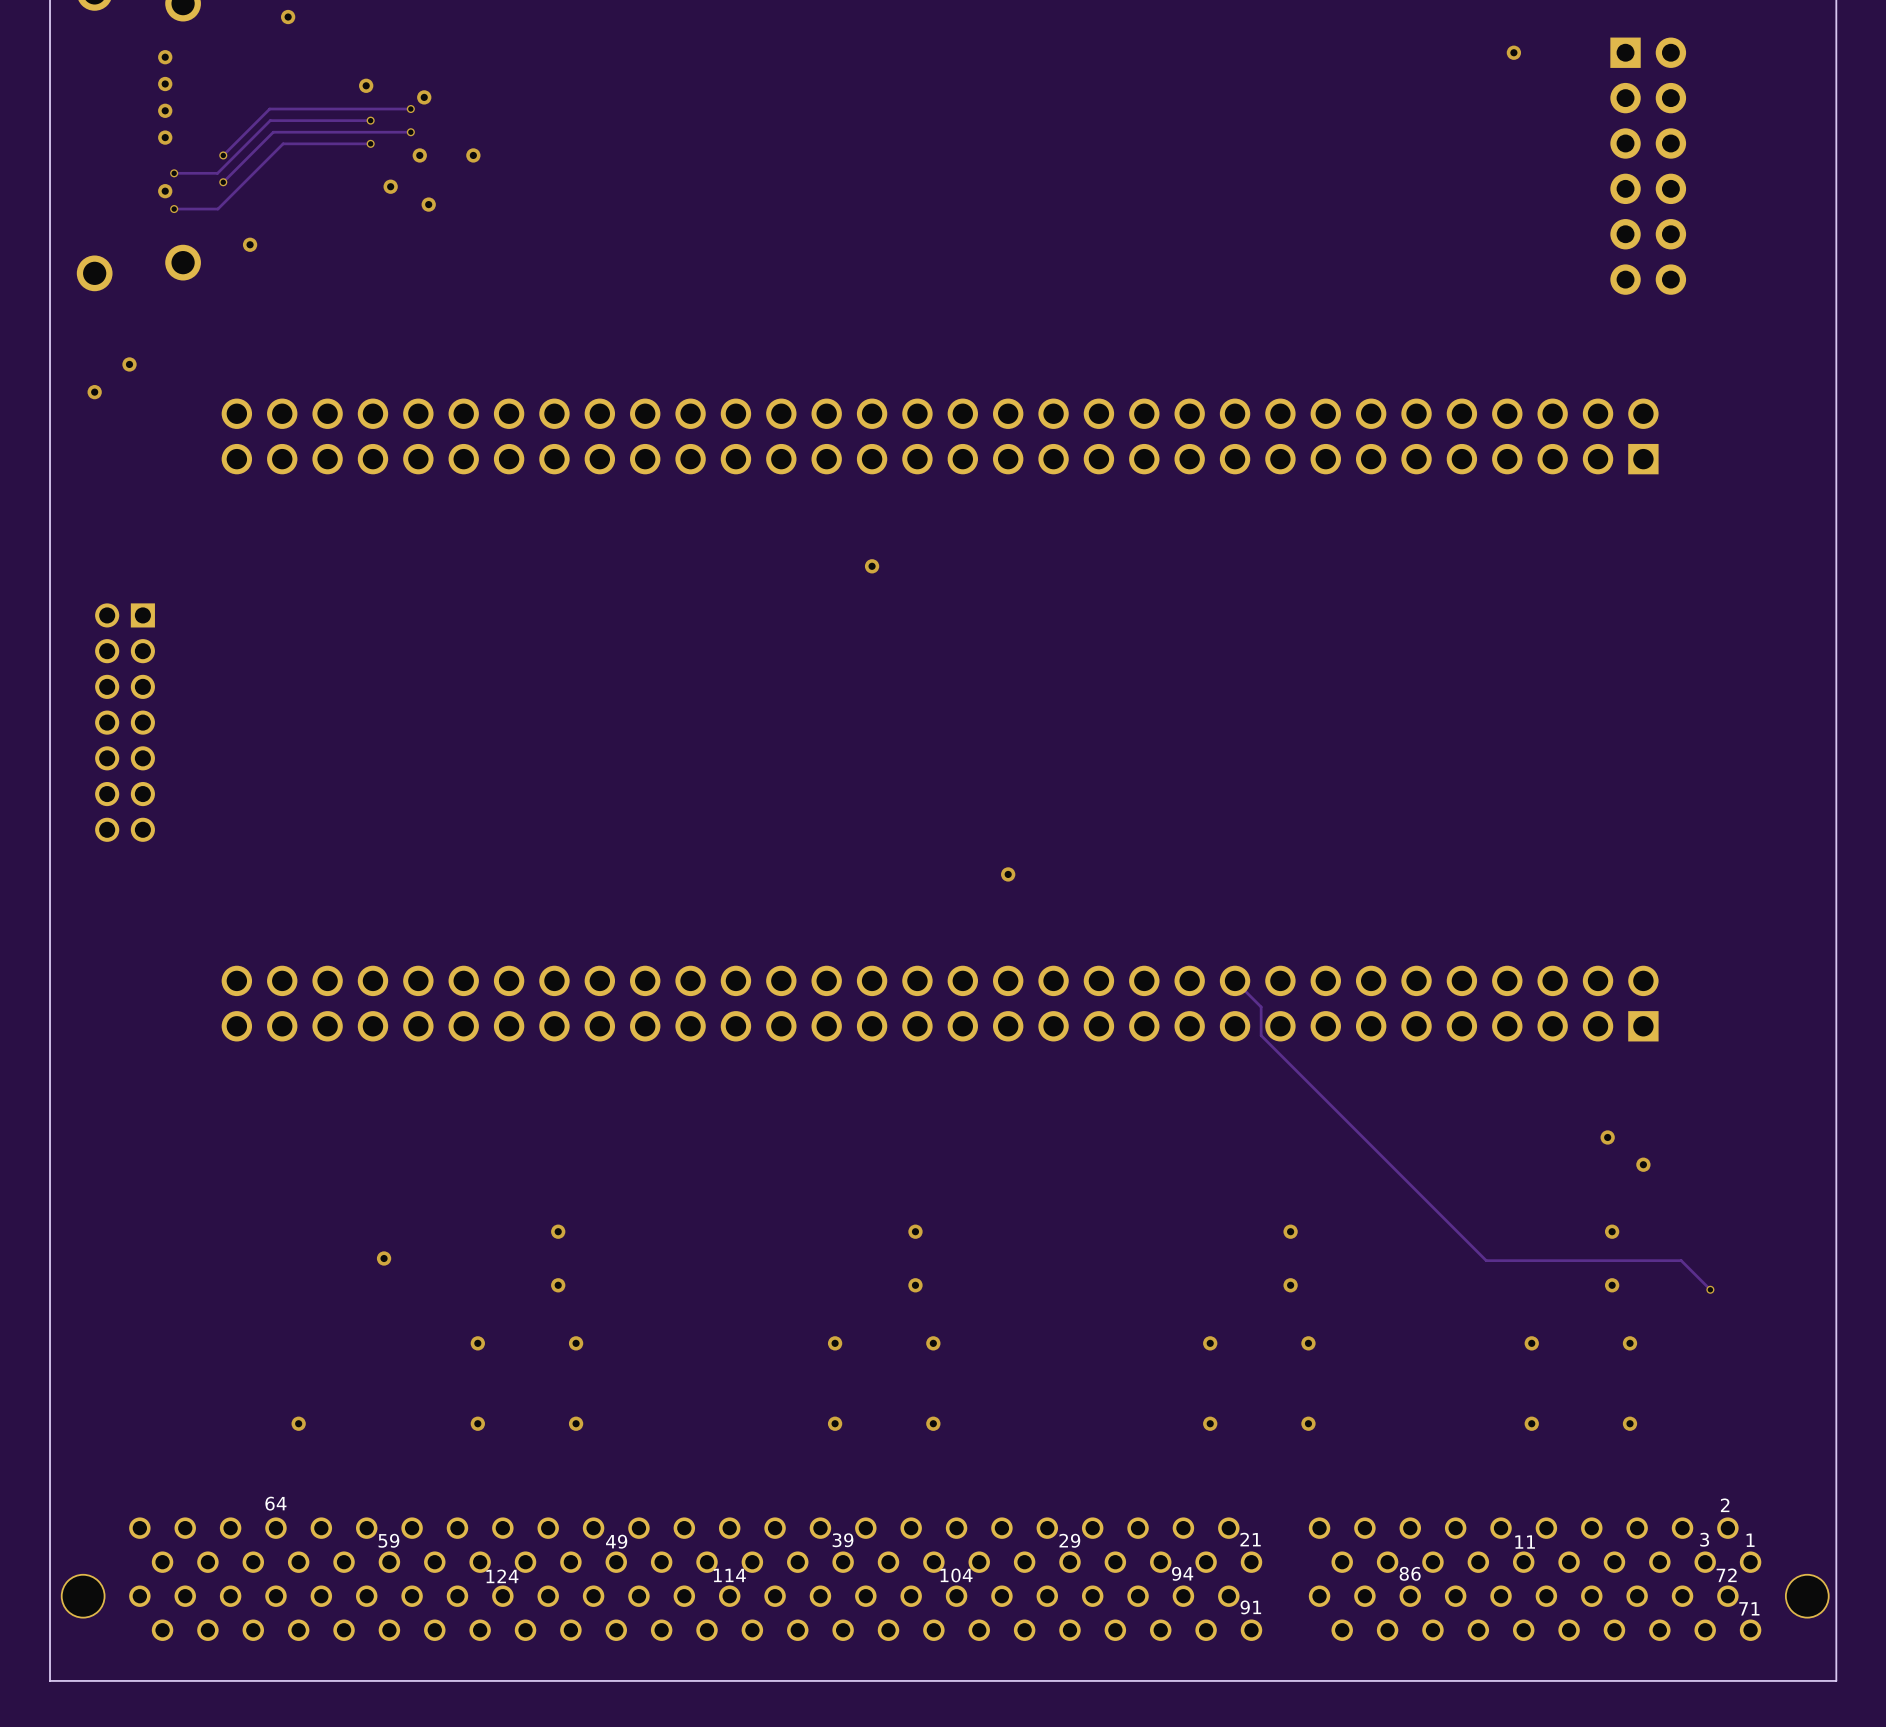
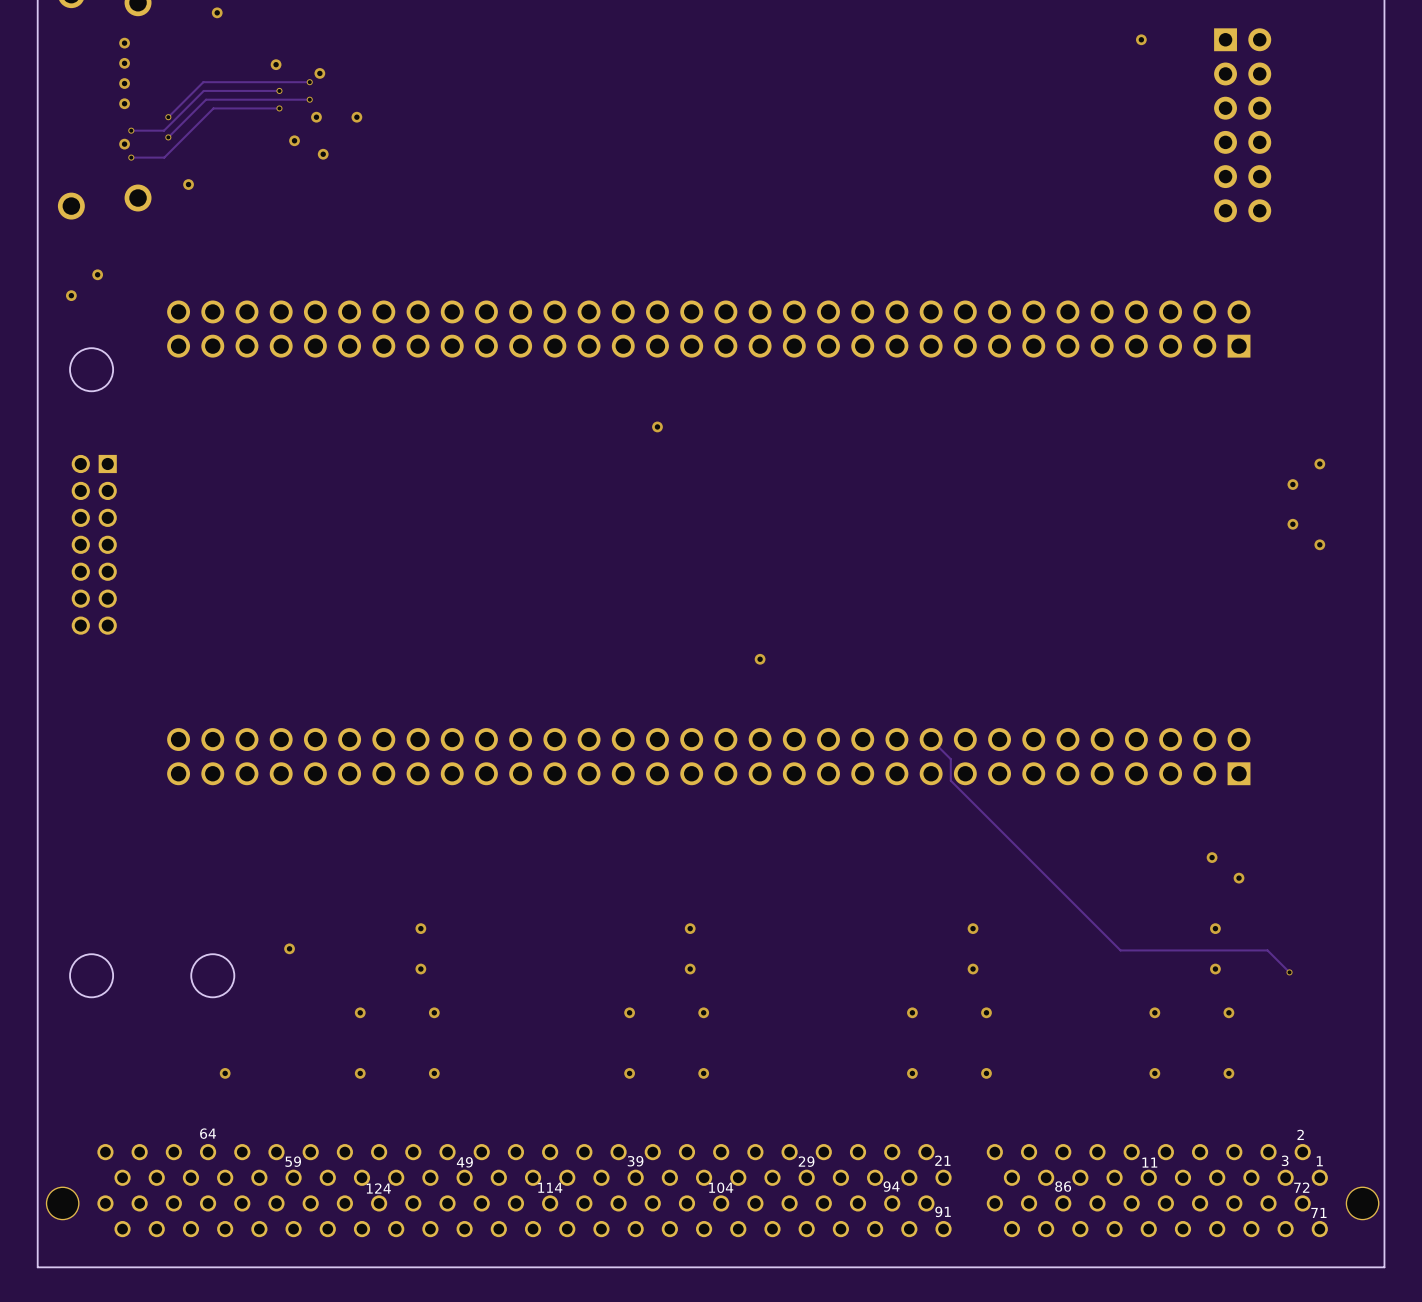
round board edge: none -> [69, 347, 114, 392]
via: none -> (1319, 463)
via: none -> (1292, 484)
via: none -> (1292, 524)
via: none -> (1319, 544)
round board edge: none -> [69, 953, 114, 998]
round board edge: none -> [190, 953, 235, 998]

